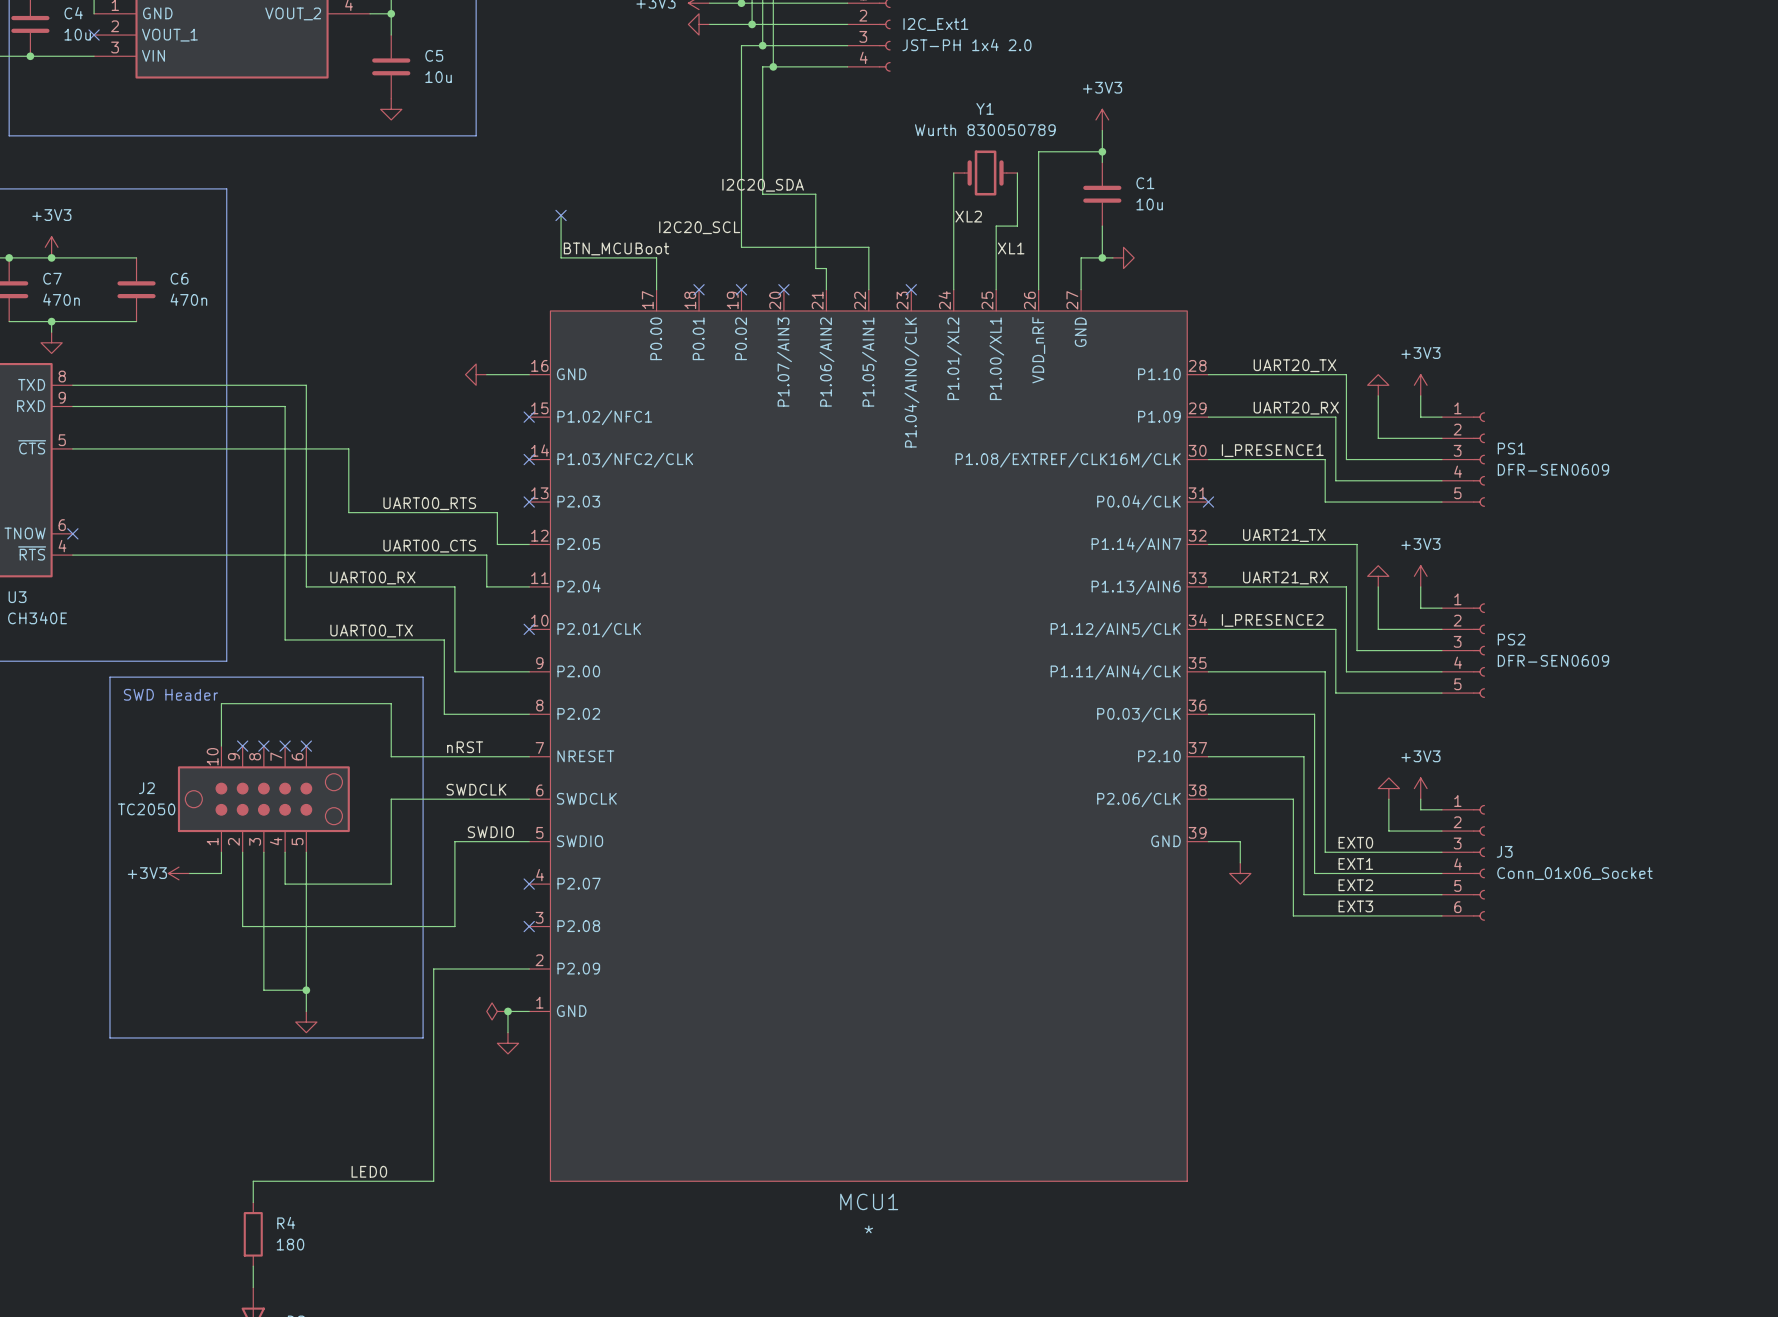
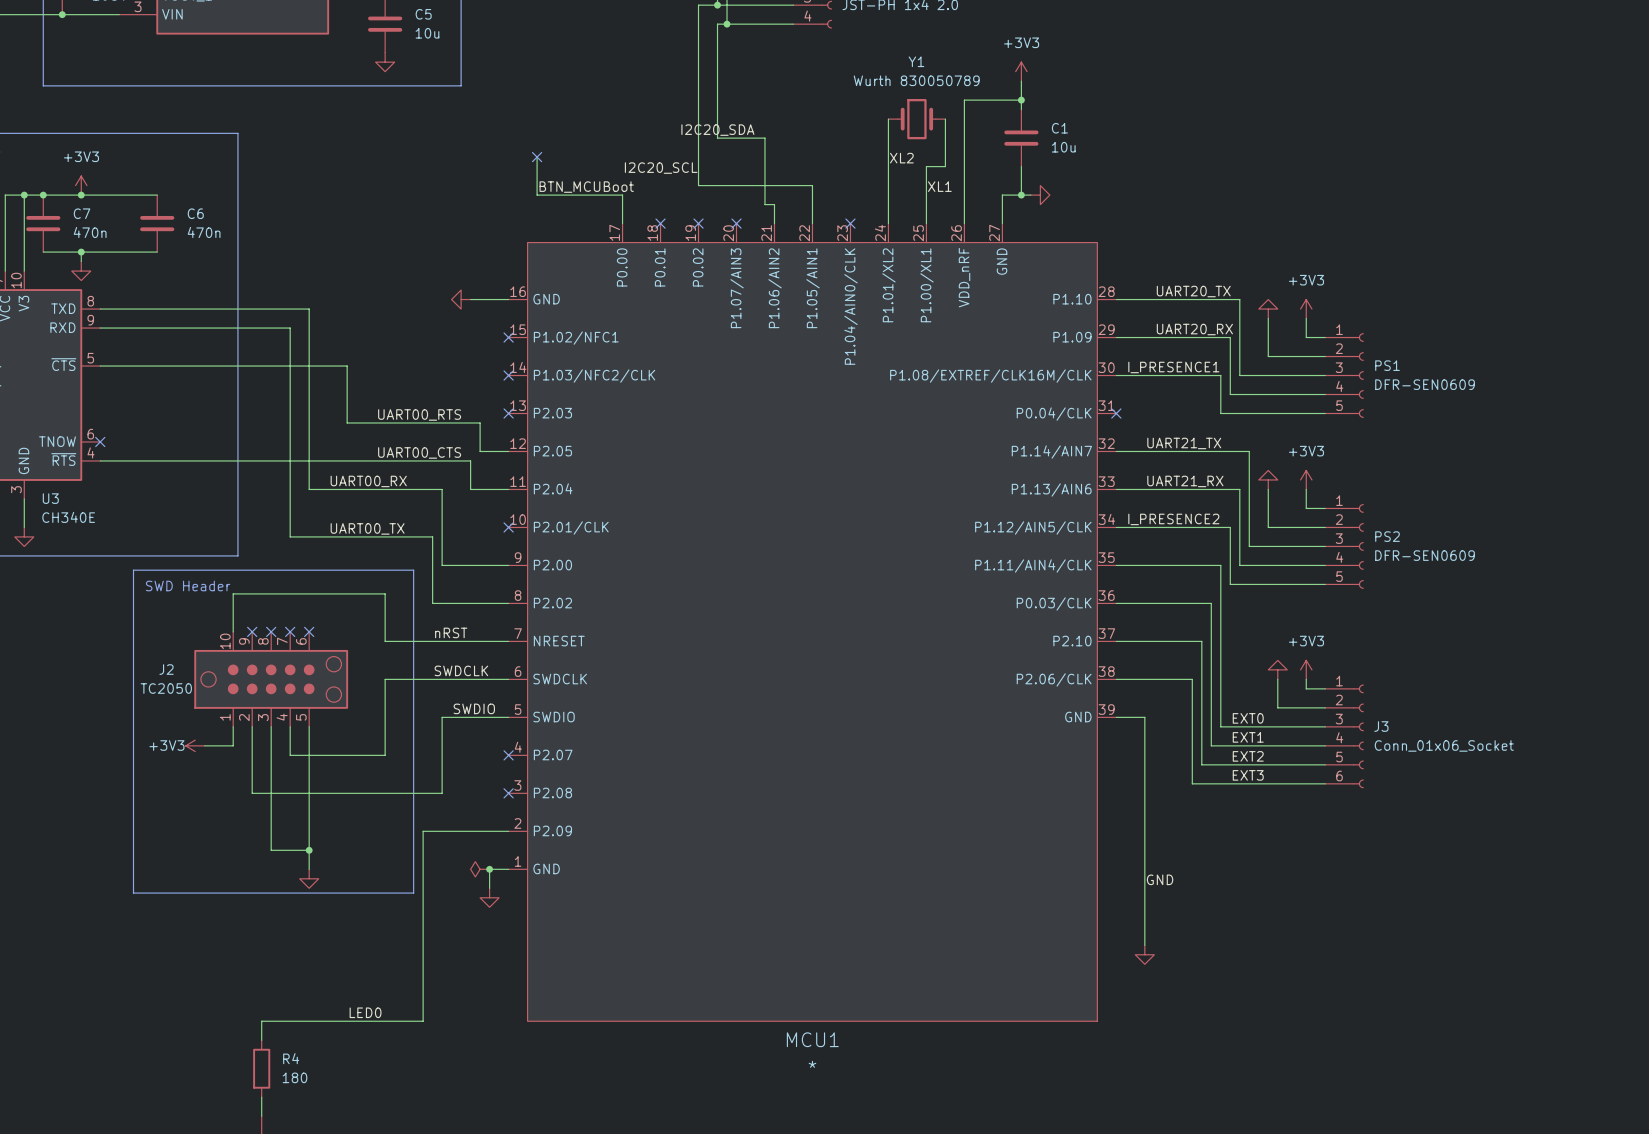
wire: none -> (1144, 736) (1144, 945)
power symbol: (1240, 873) -> none
label: none -> GND (1160, 879)
power symbol: none -> (1144, 954)

